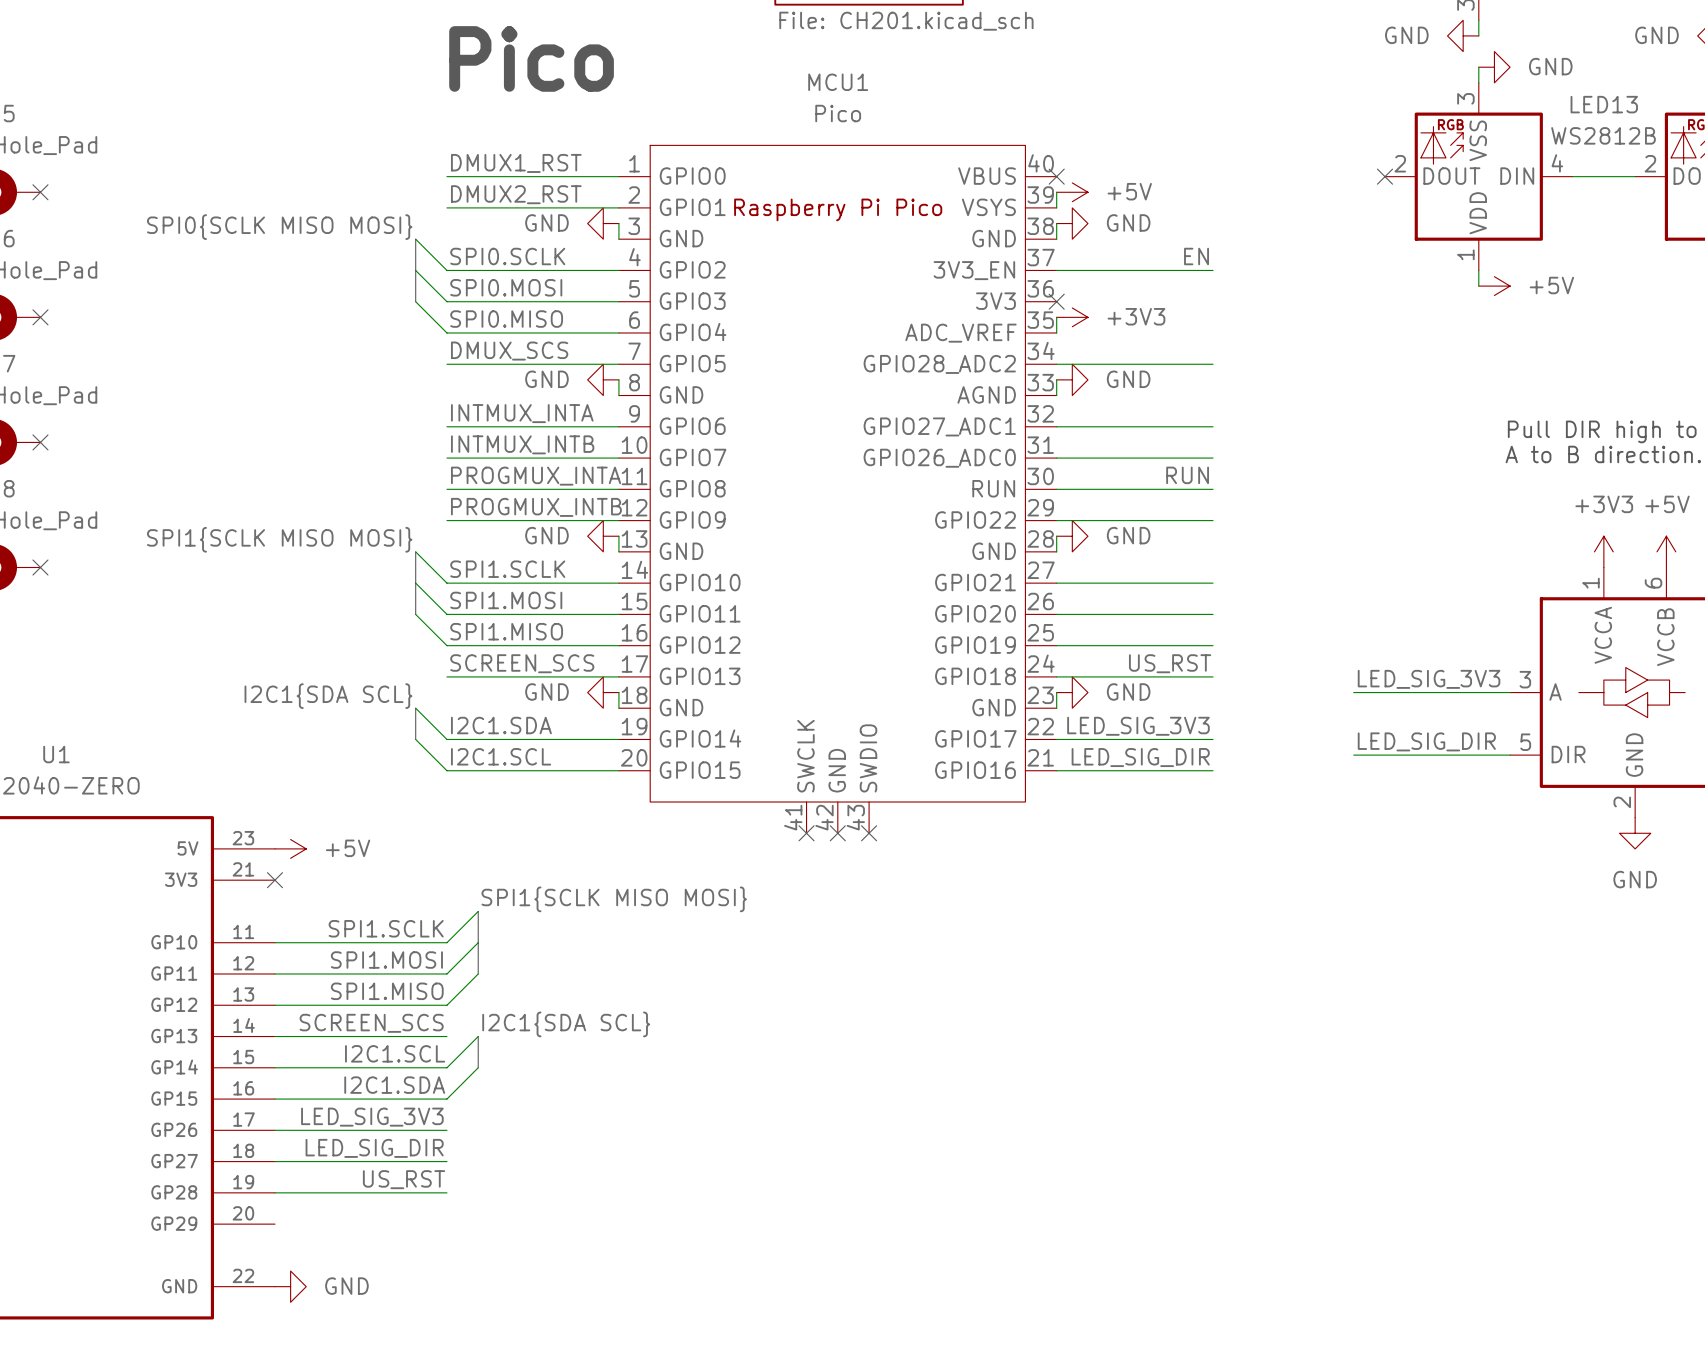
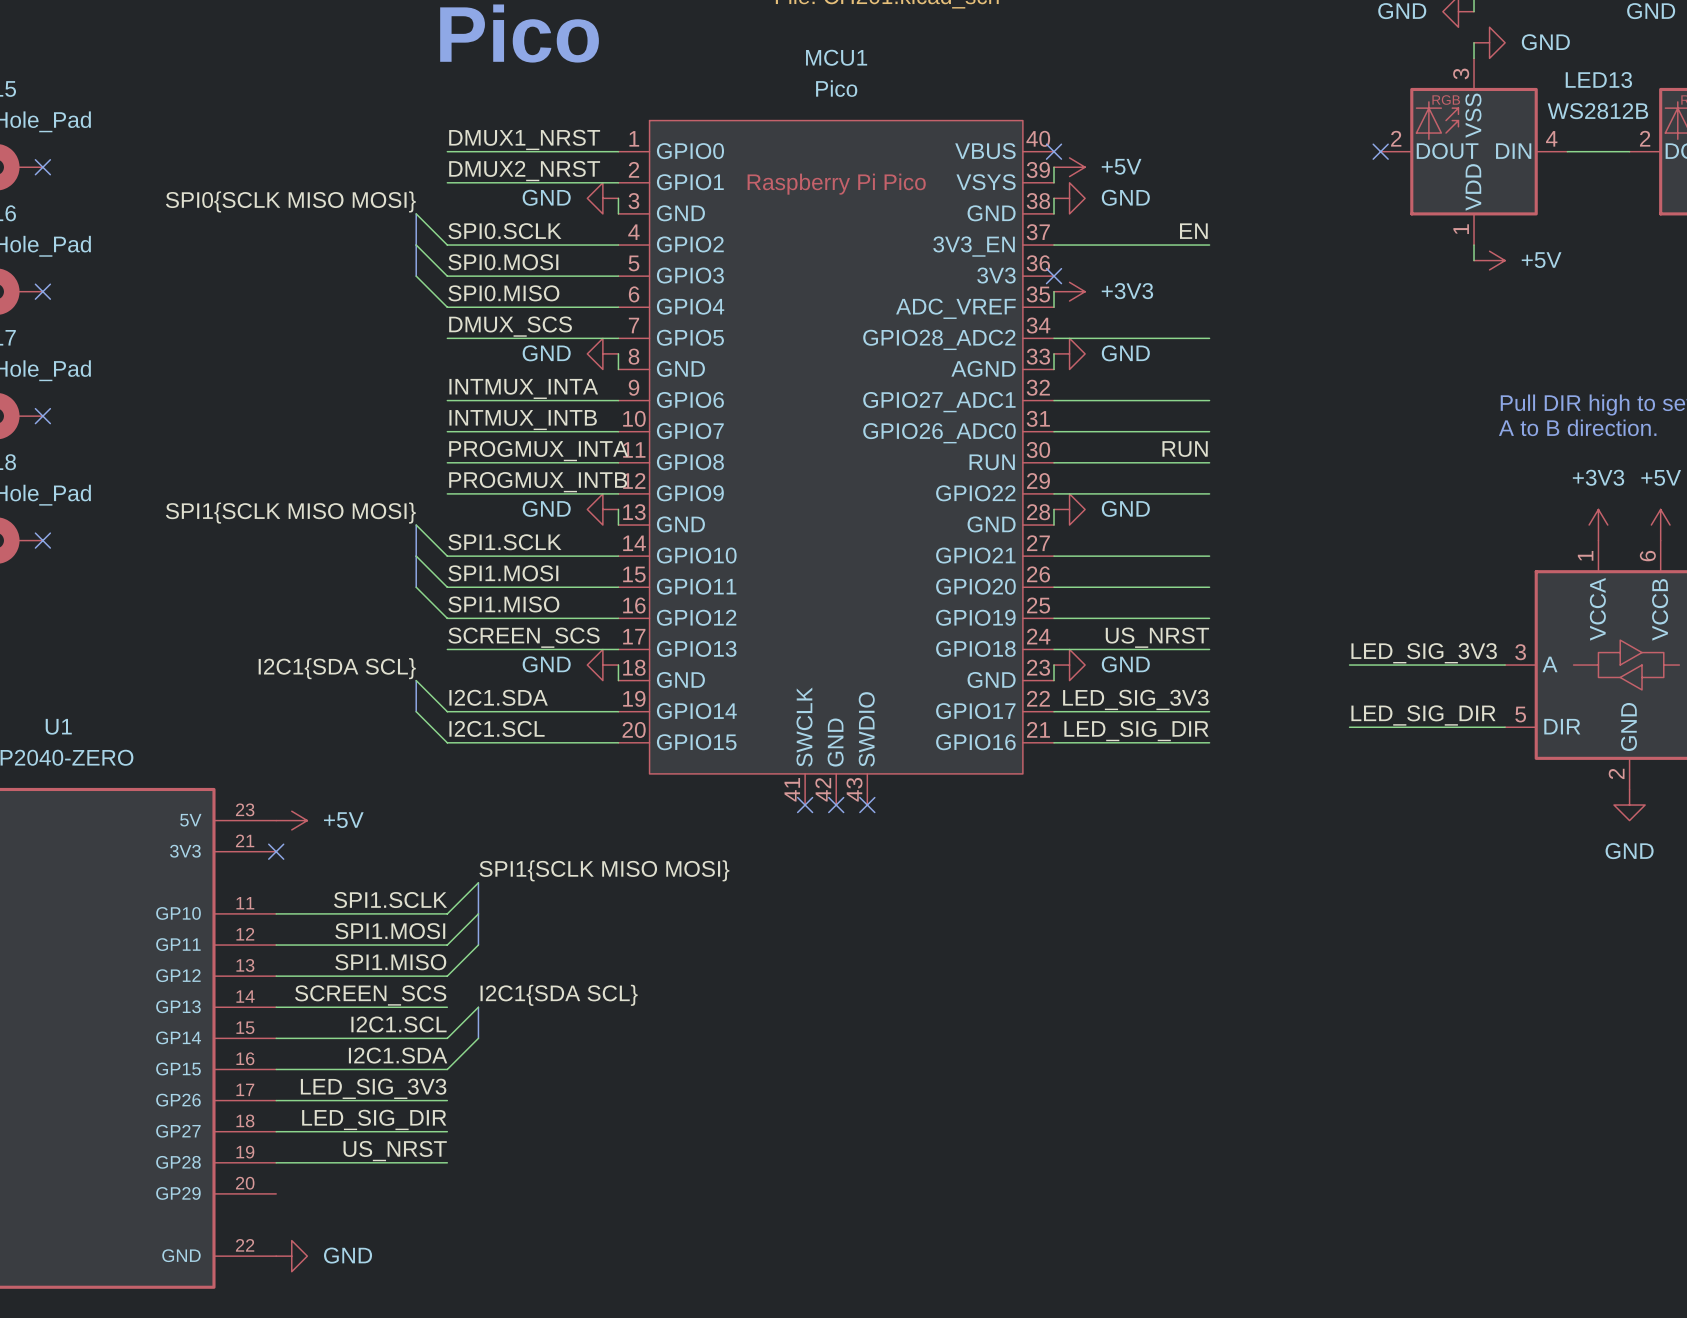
label: DMUX1_RST (516, 163) -> DMUX1_NRST (524, 139)
label: DMUX2_RST (516, 194) -> DMUX2_NRST (524, 171)
label: US_RST (1170, 663) -> US_NRST (1157, 637)
label: US_RST (404, 1179) -> US_NRST (395, 1151)

